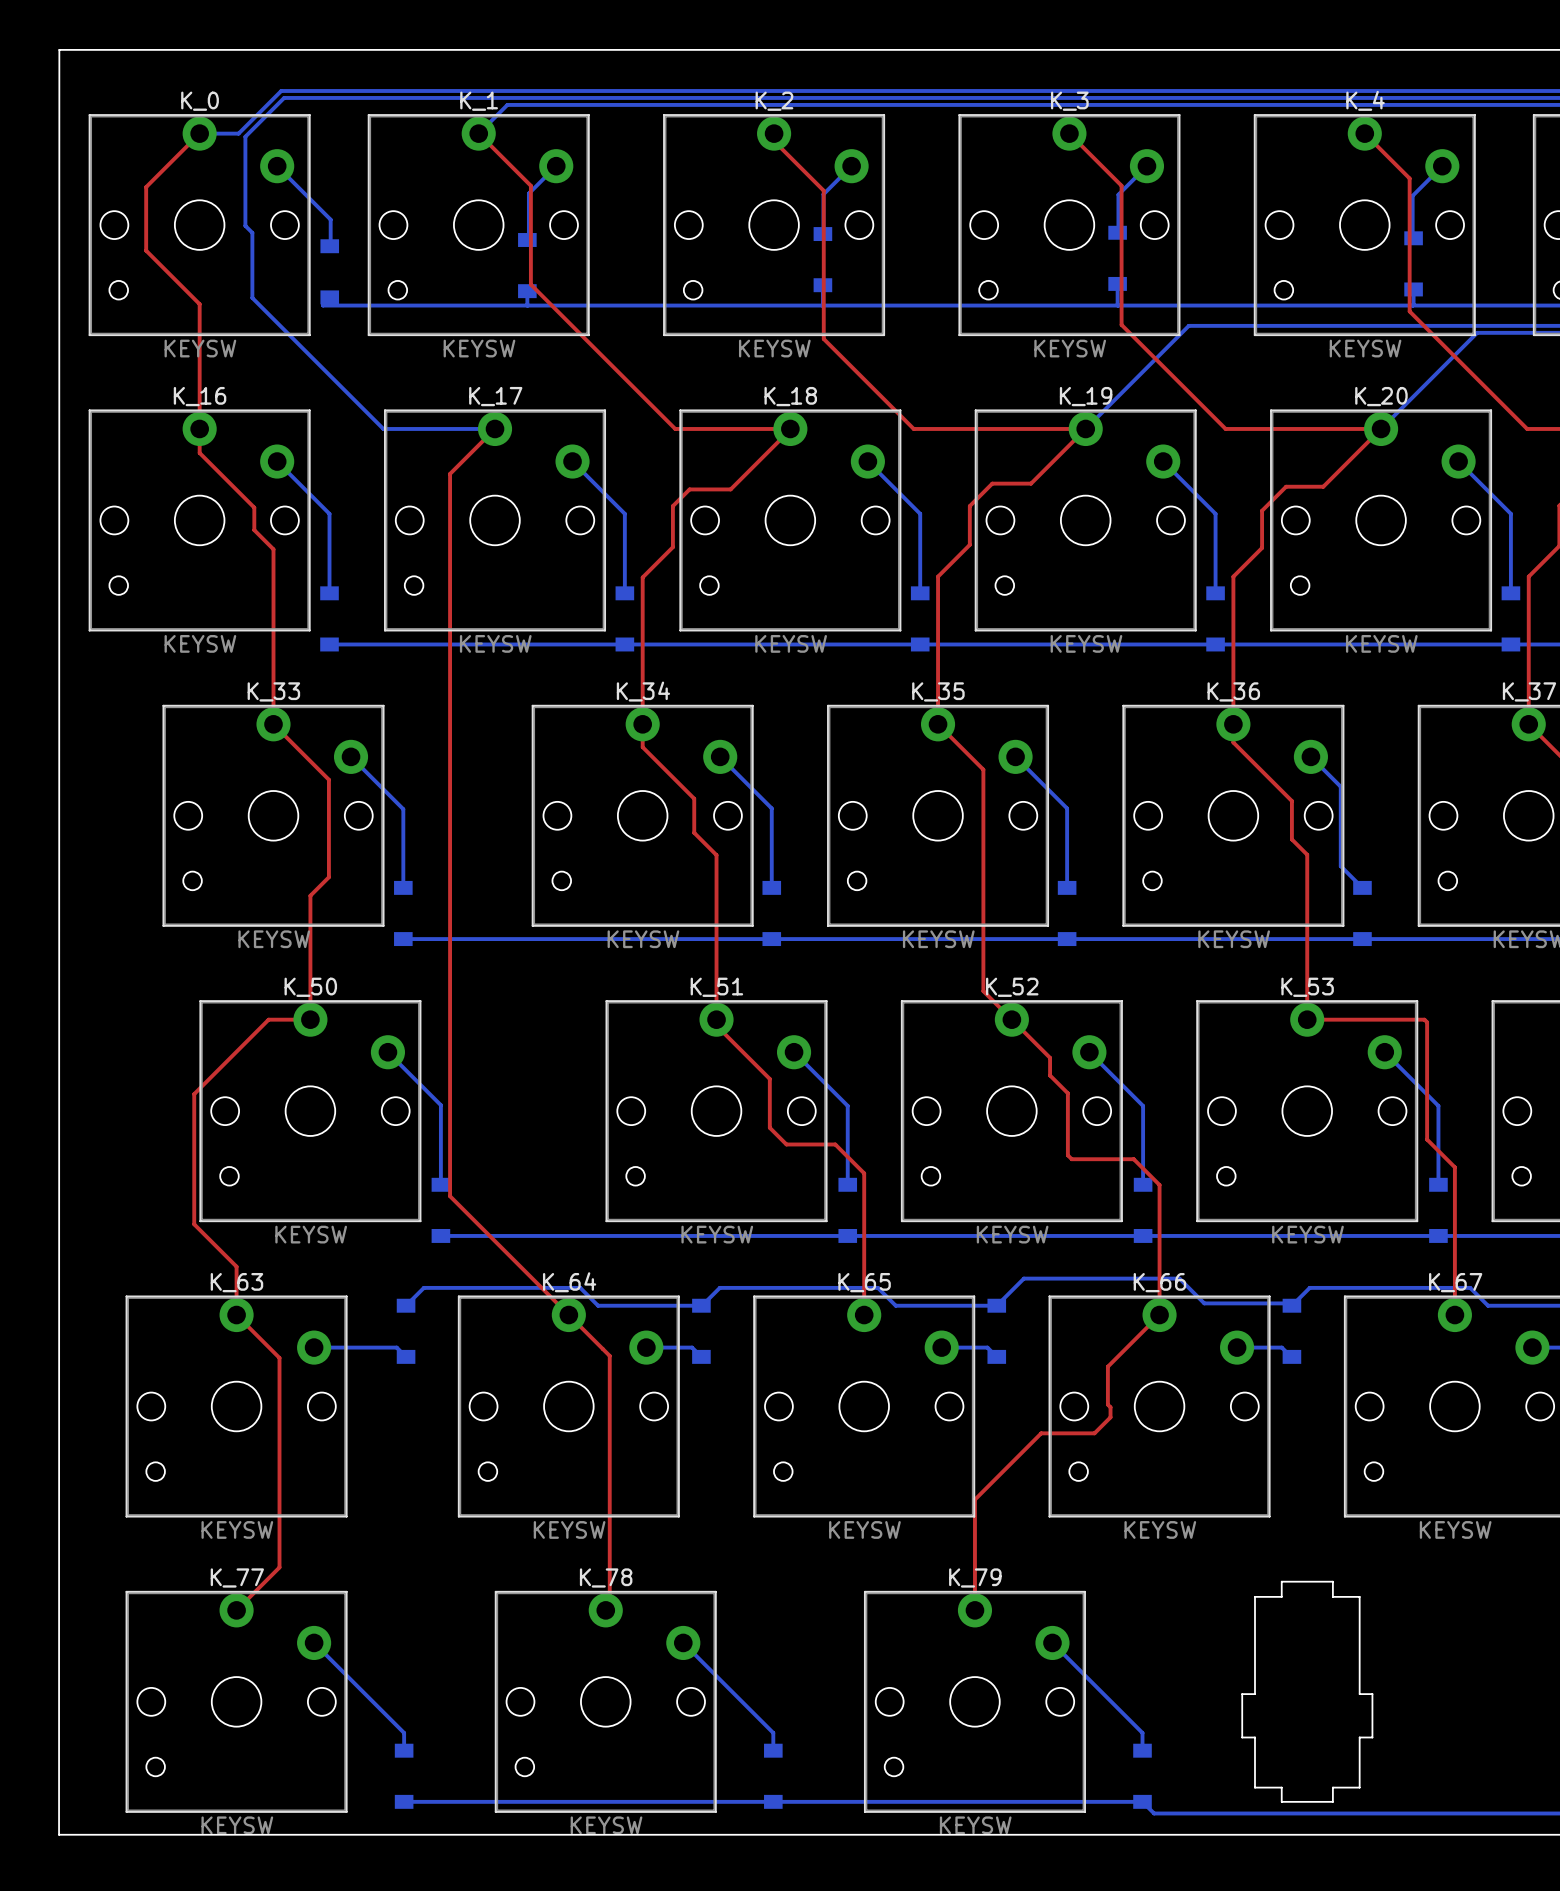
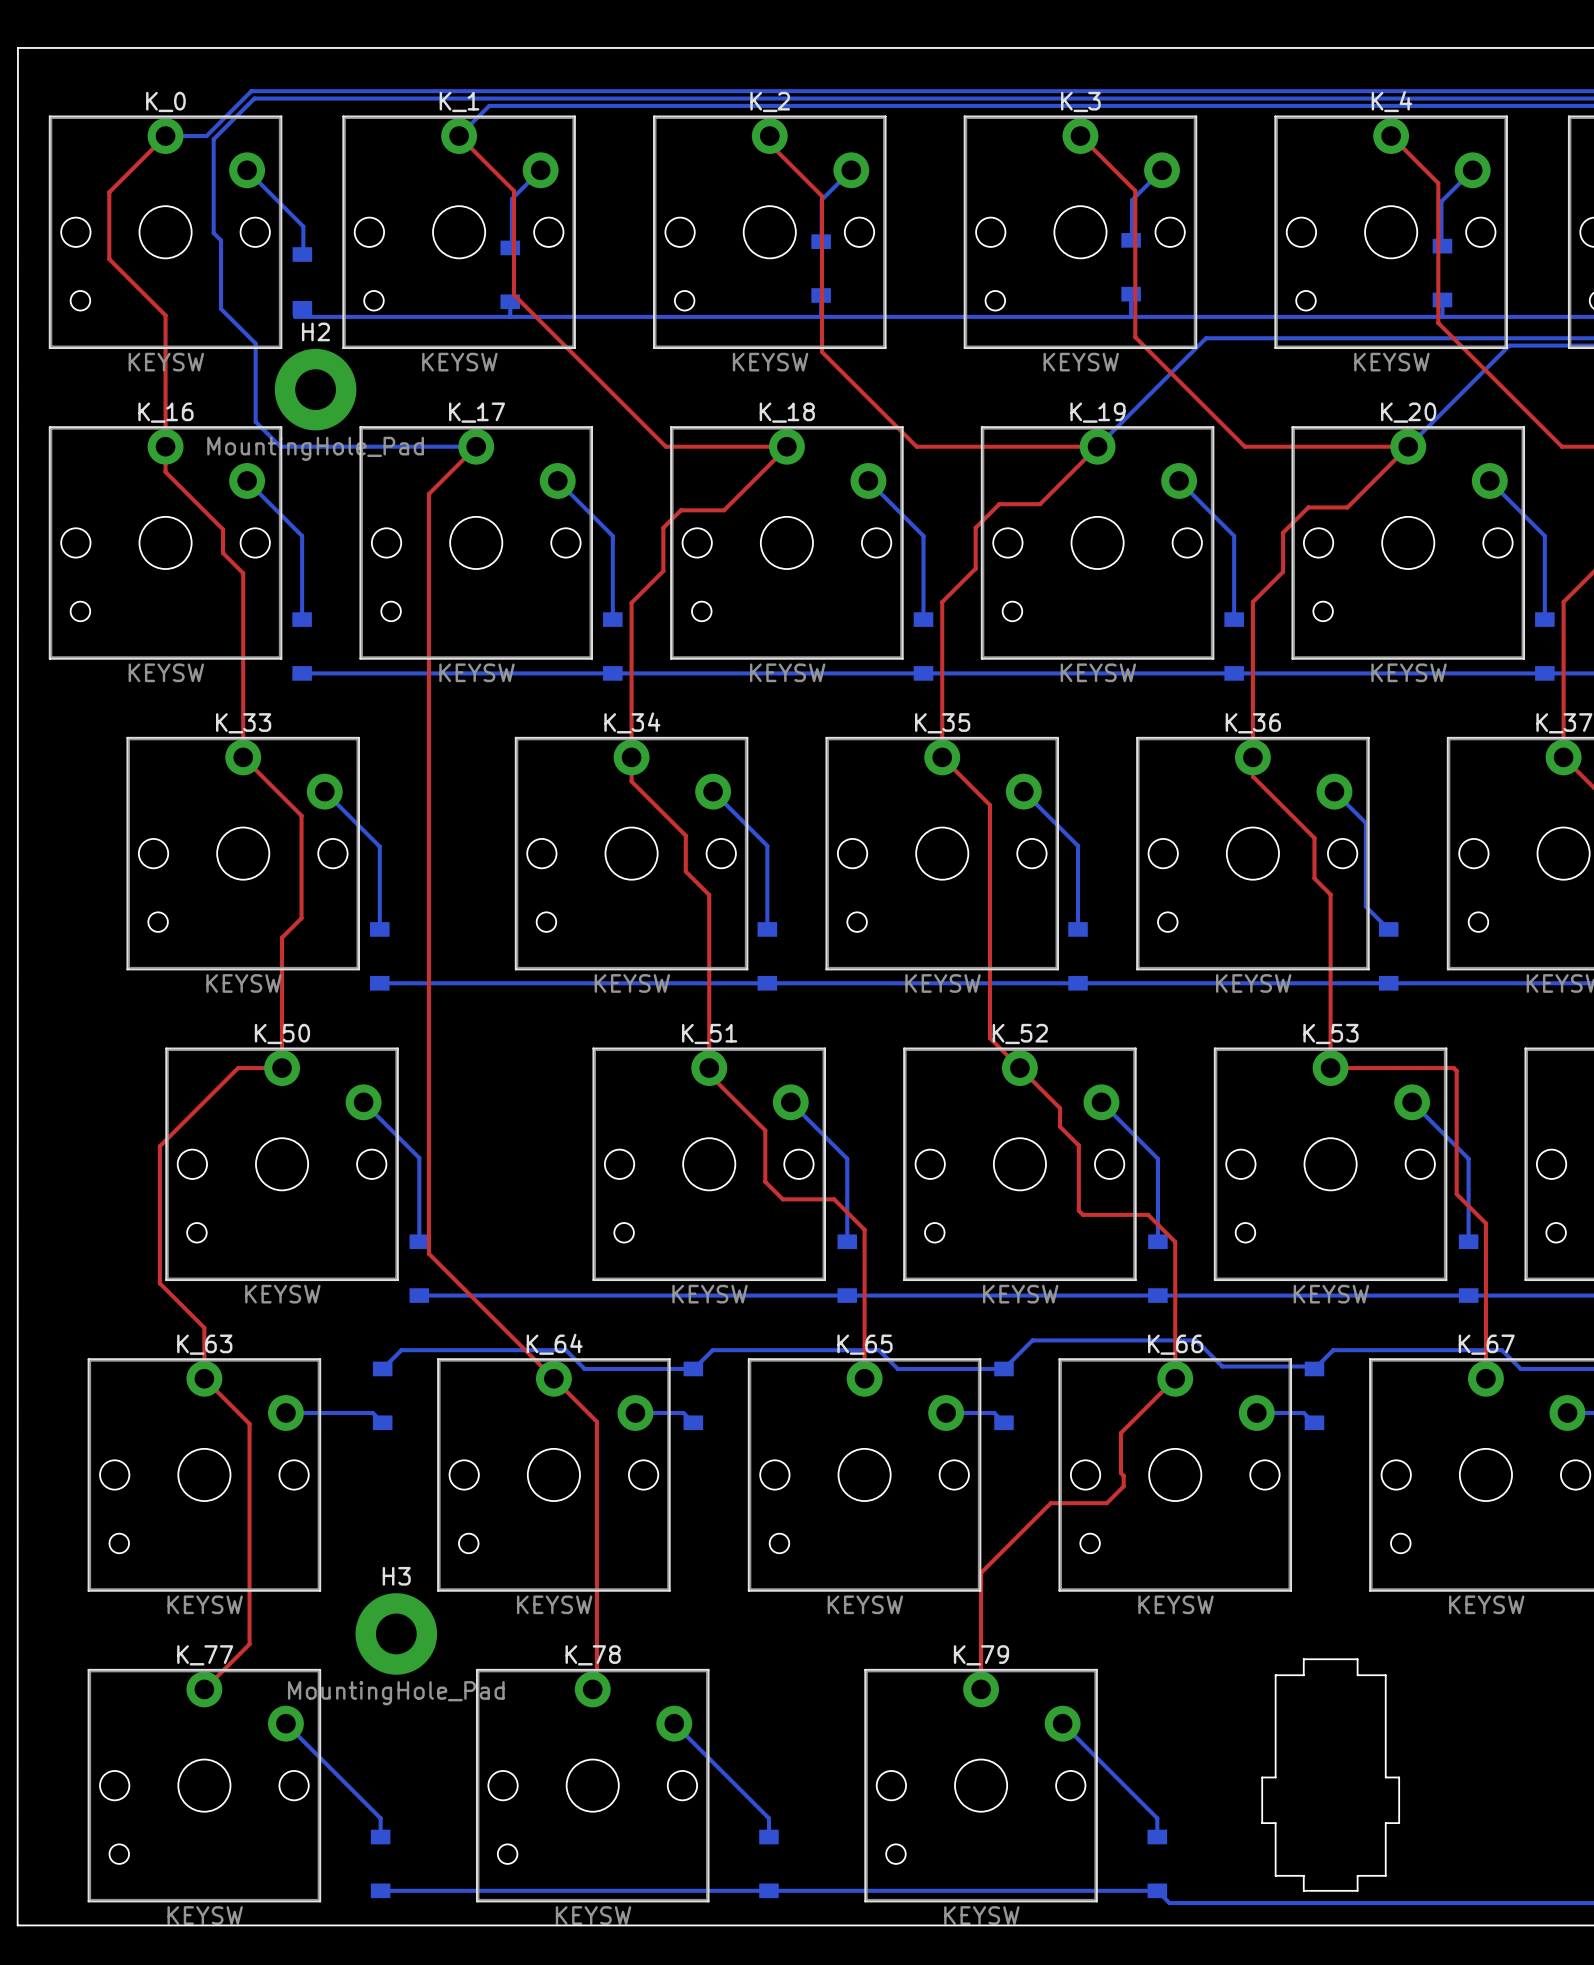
bottom track: (285, 330) (383, 428) -> (255, 343) (255, 421) (280, 446) (358, 446)
H2: none -> MountingHole_Pad (315, 389)
H3: none -> MountingHole_Pad (396, 1633)

